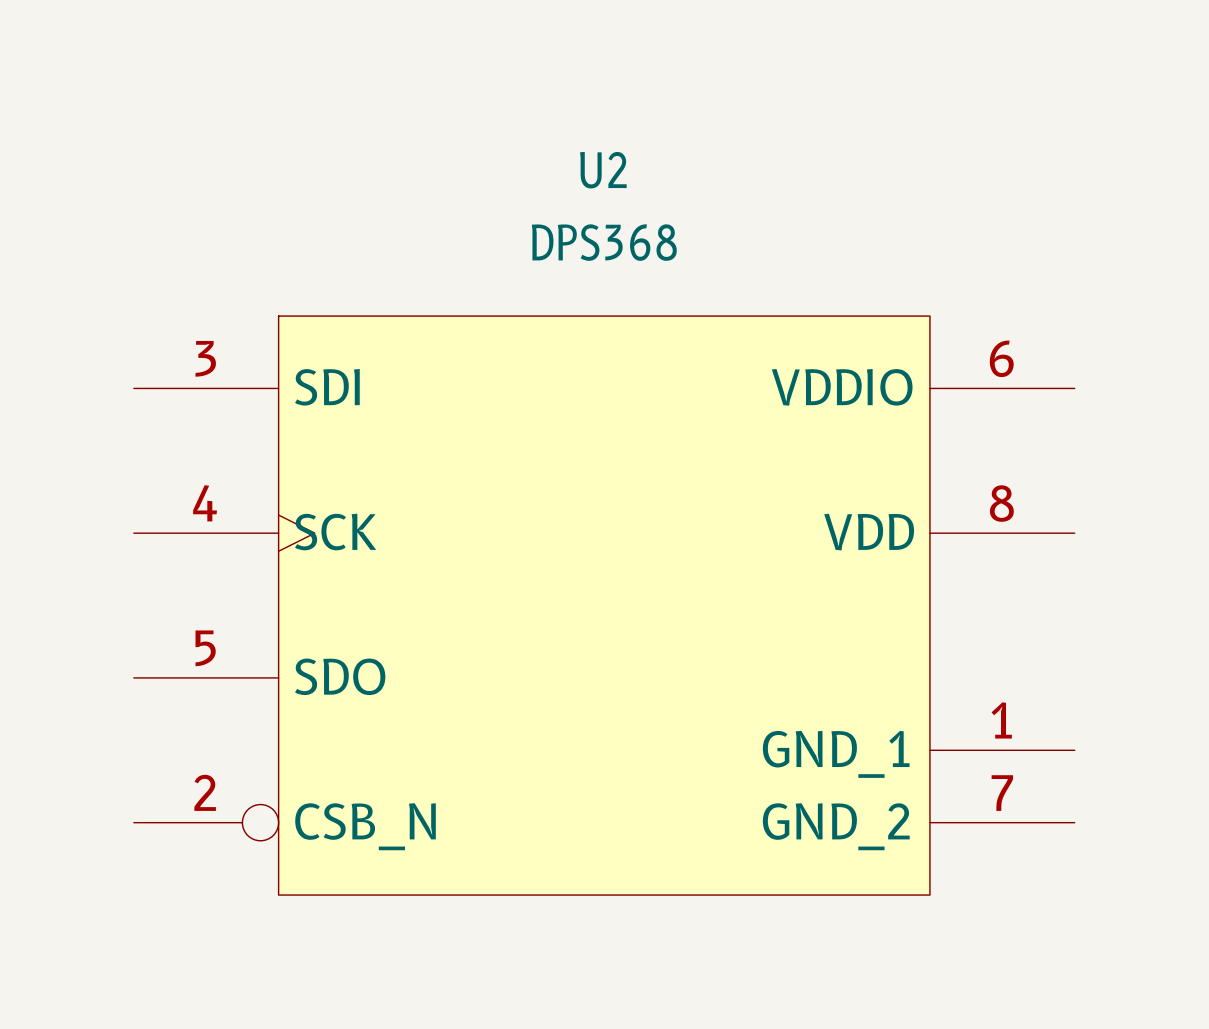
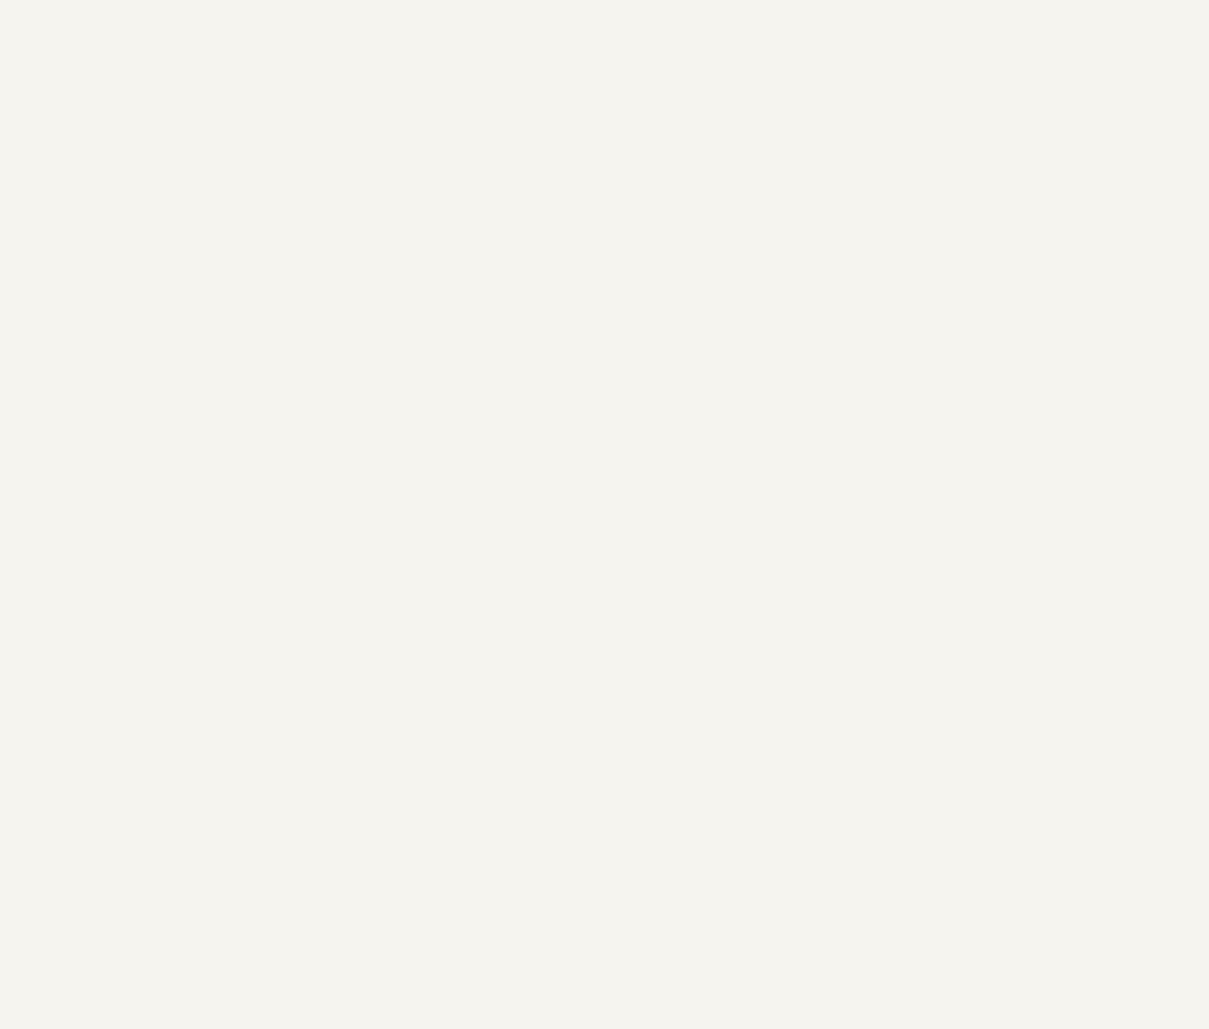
U2: DPS368 (604, 605) -> none

